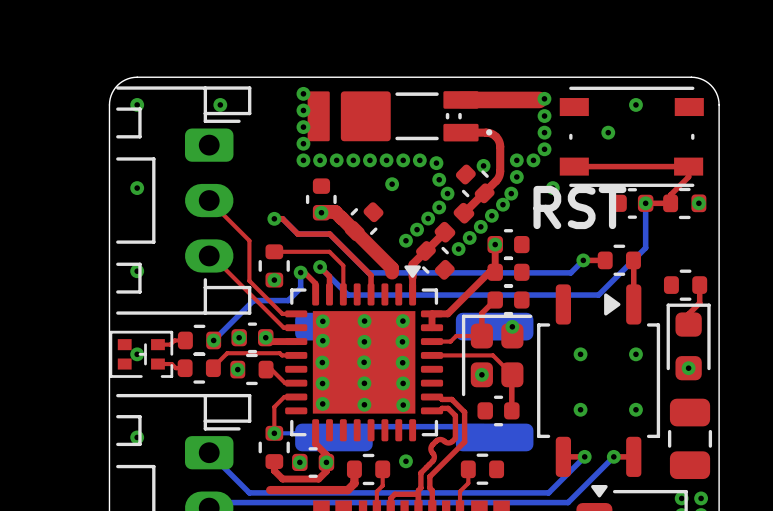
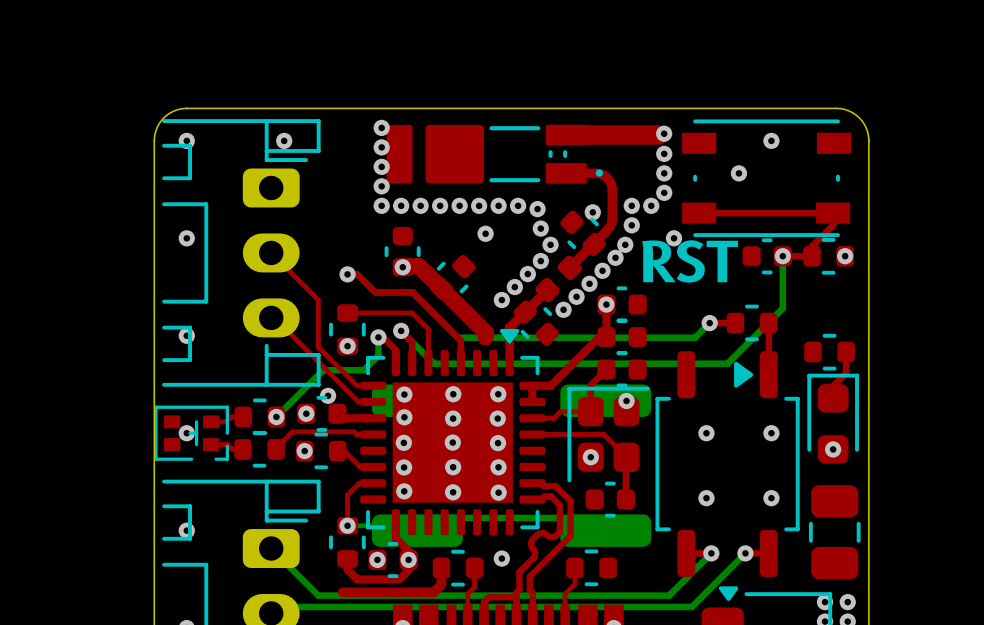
via position: (265, 337) -> (328, 395)

